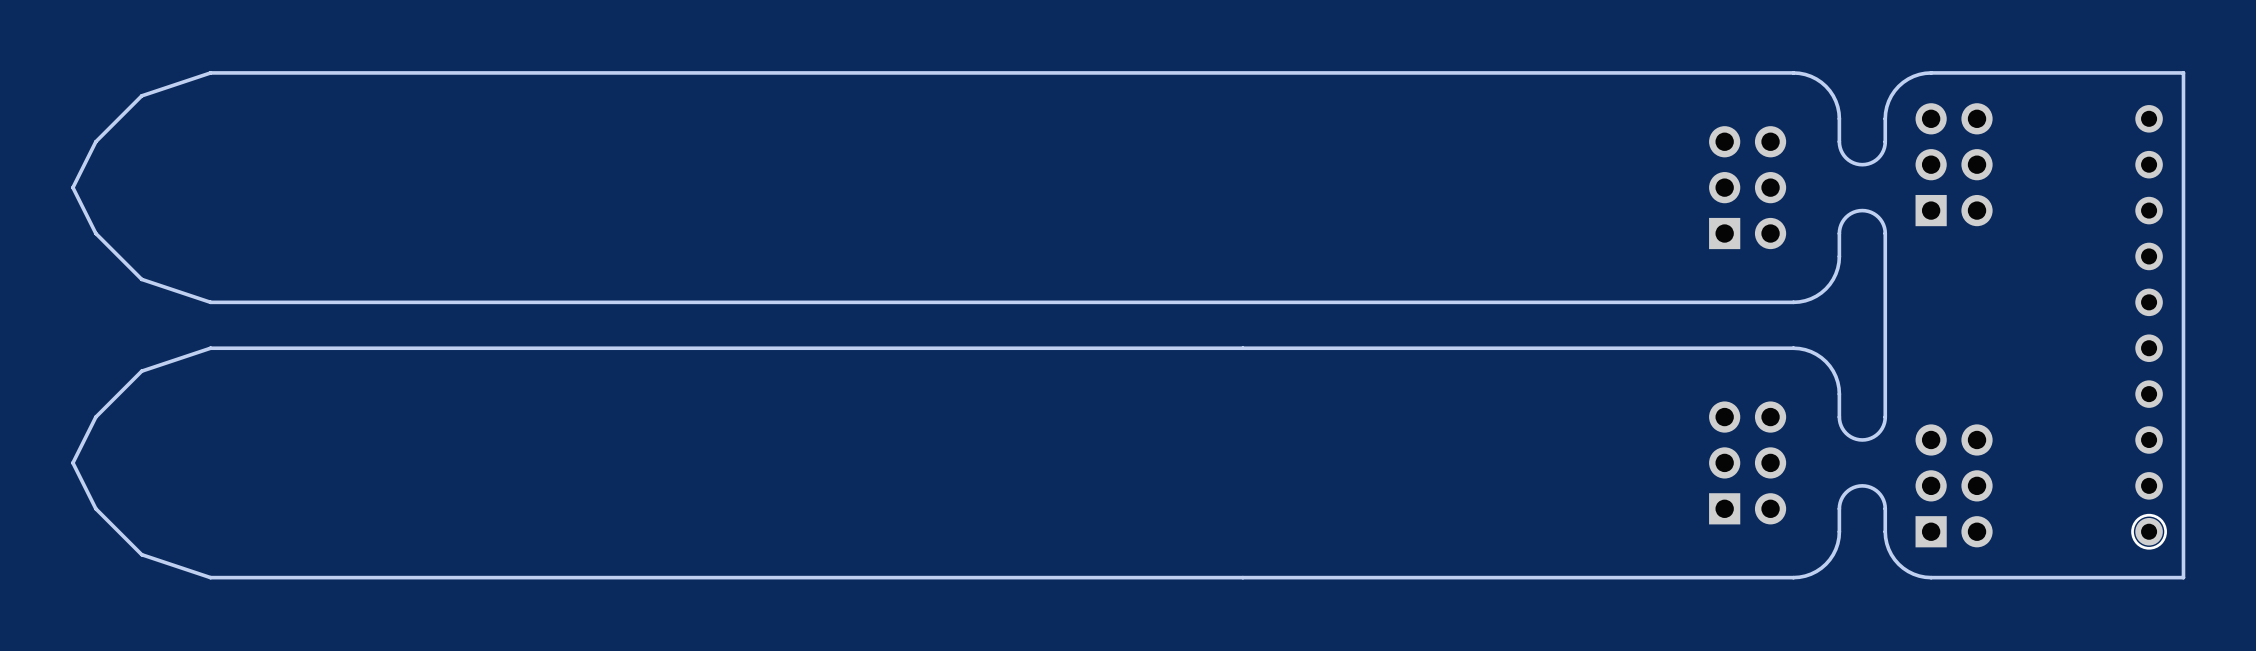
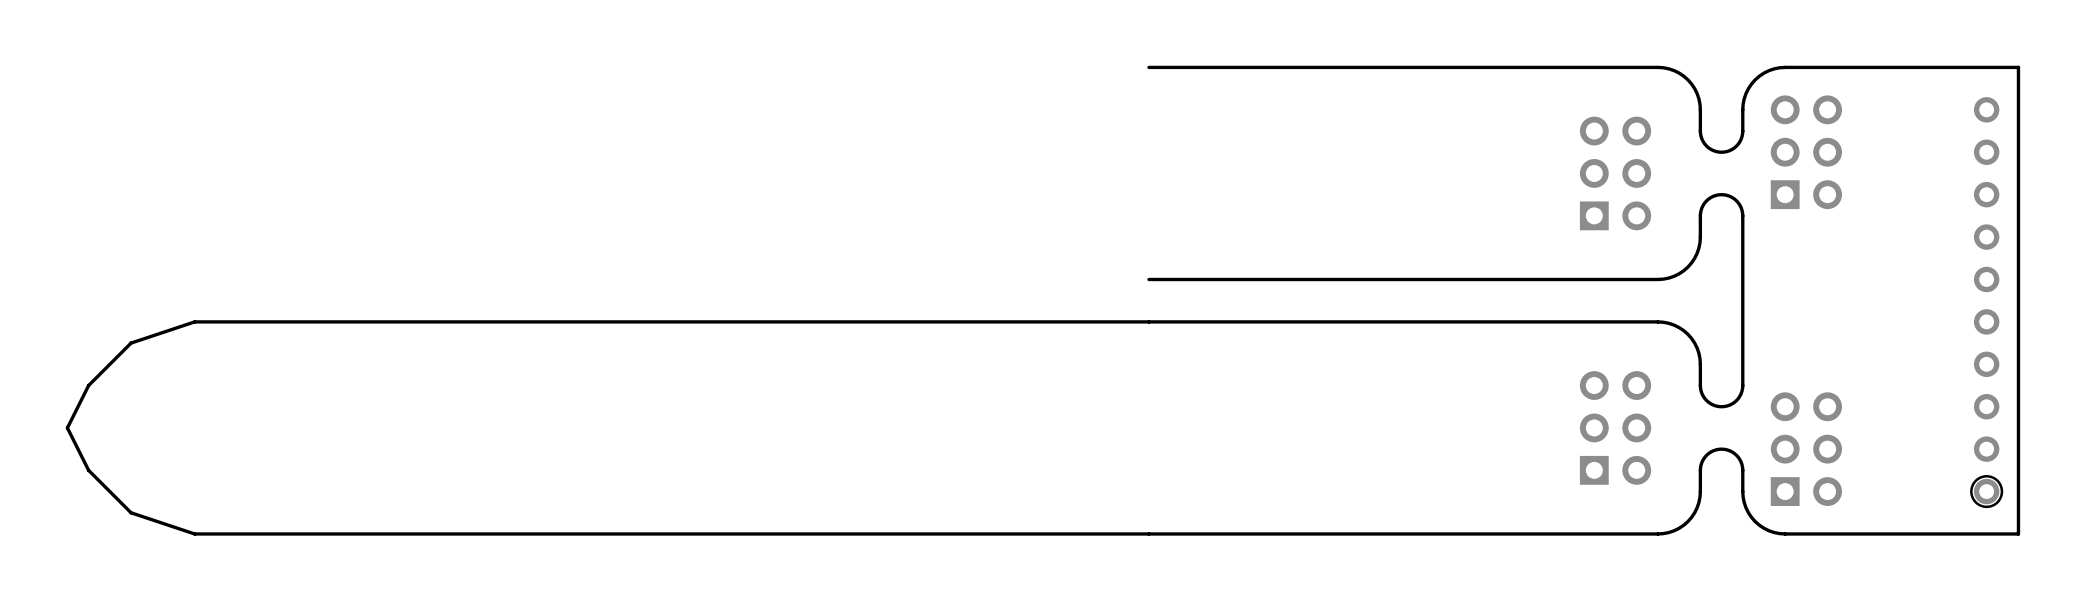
board edge: (1242, 72) (210, 72) (141, 95) (95, 141) (72, 187) (95, 233) (141, 279) (210, 302) (1242, 302) -> none

